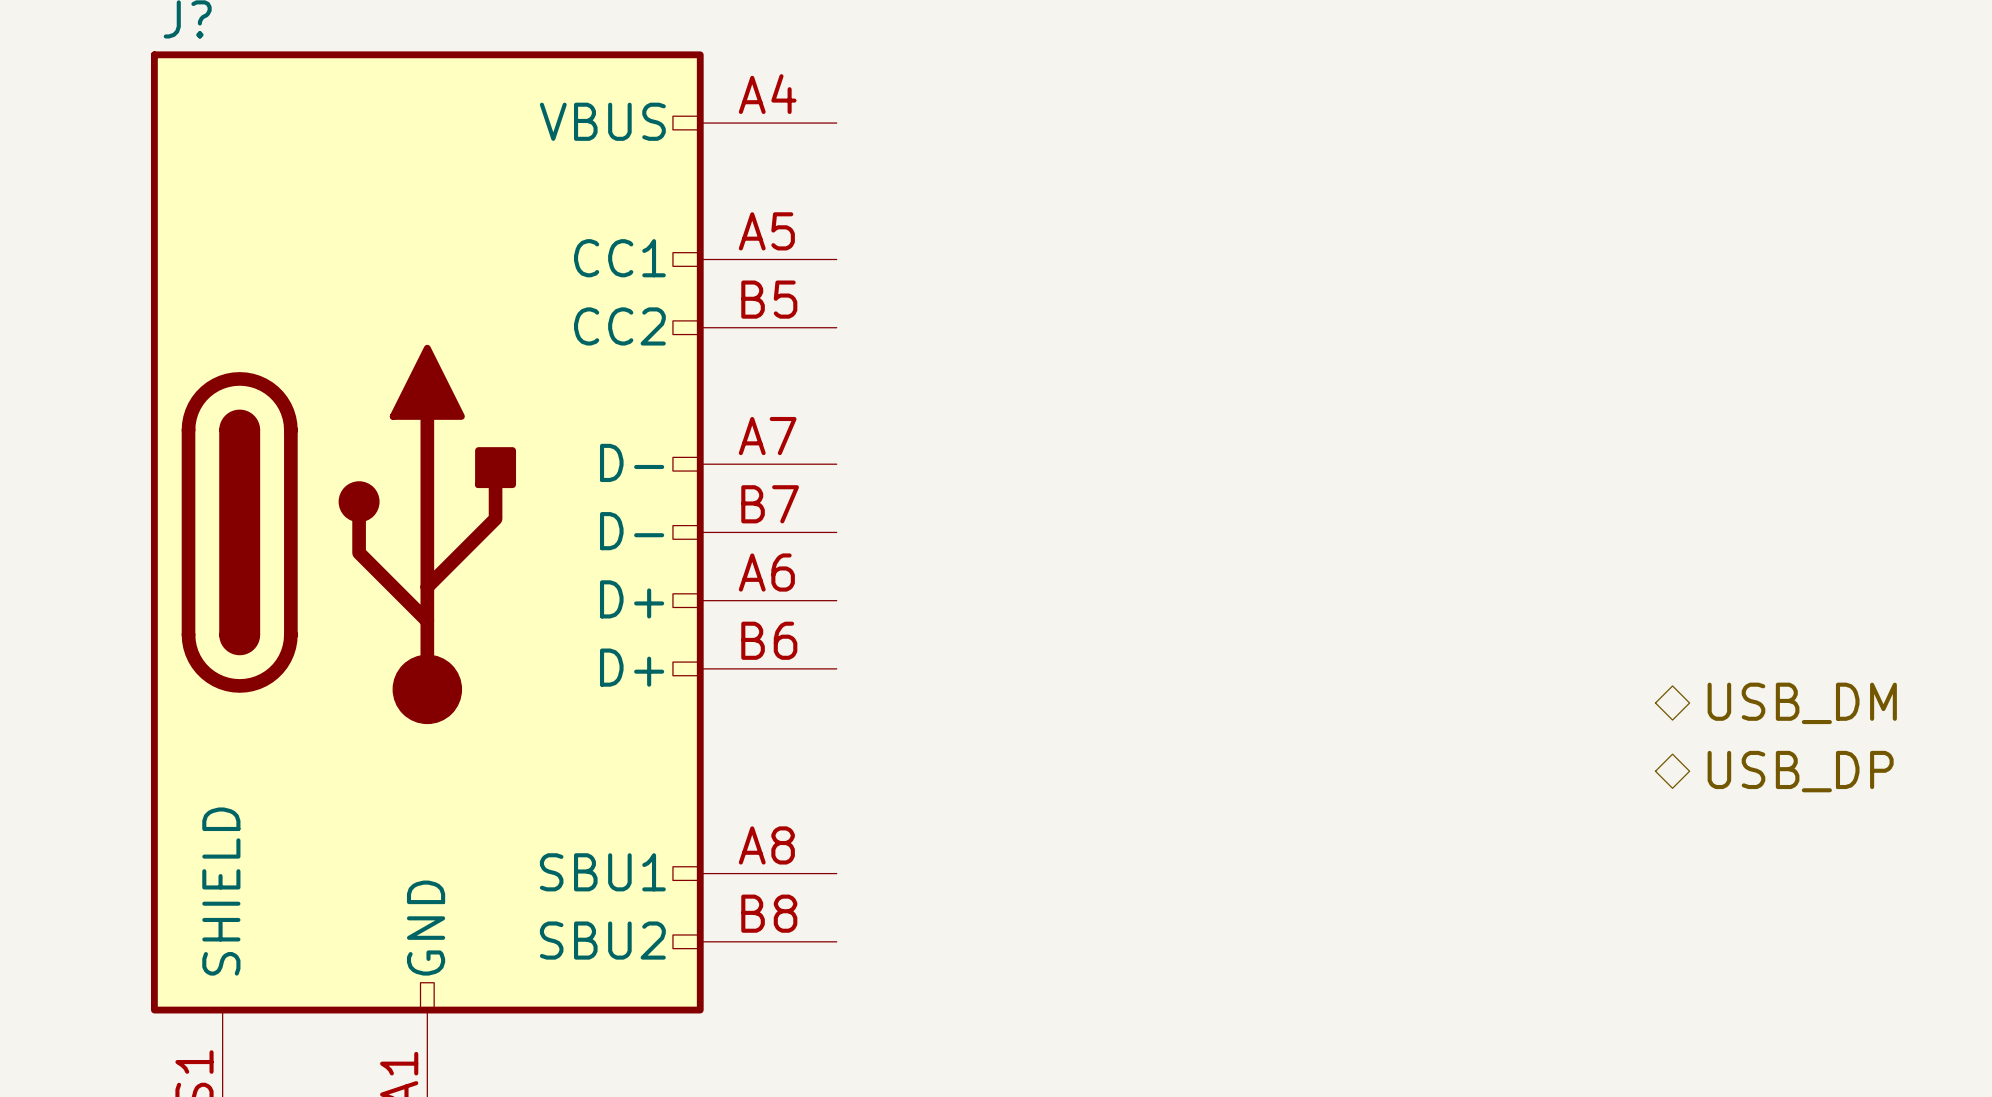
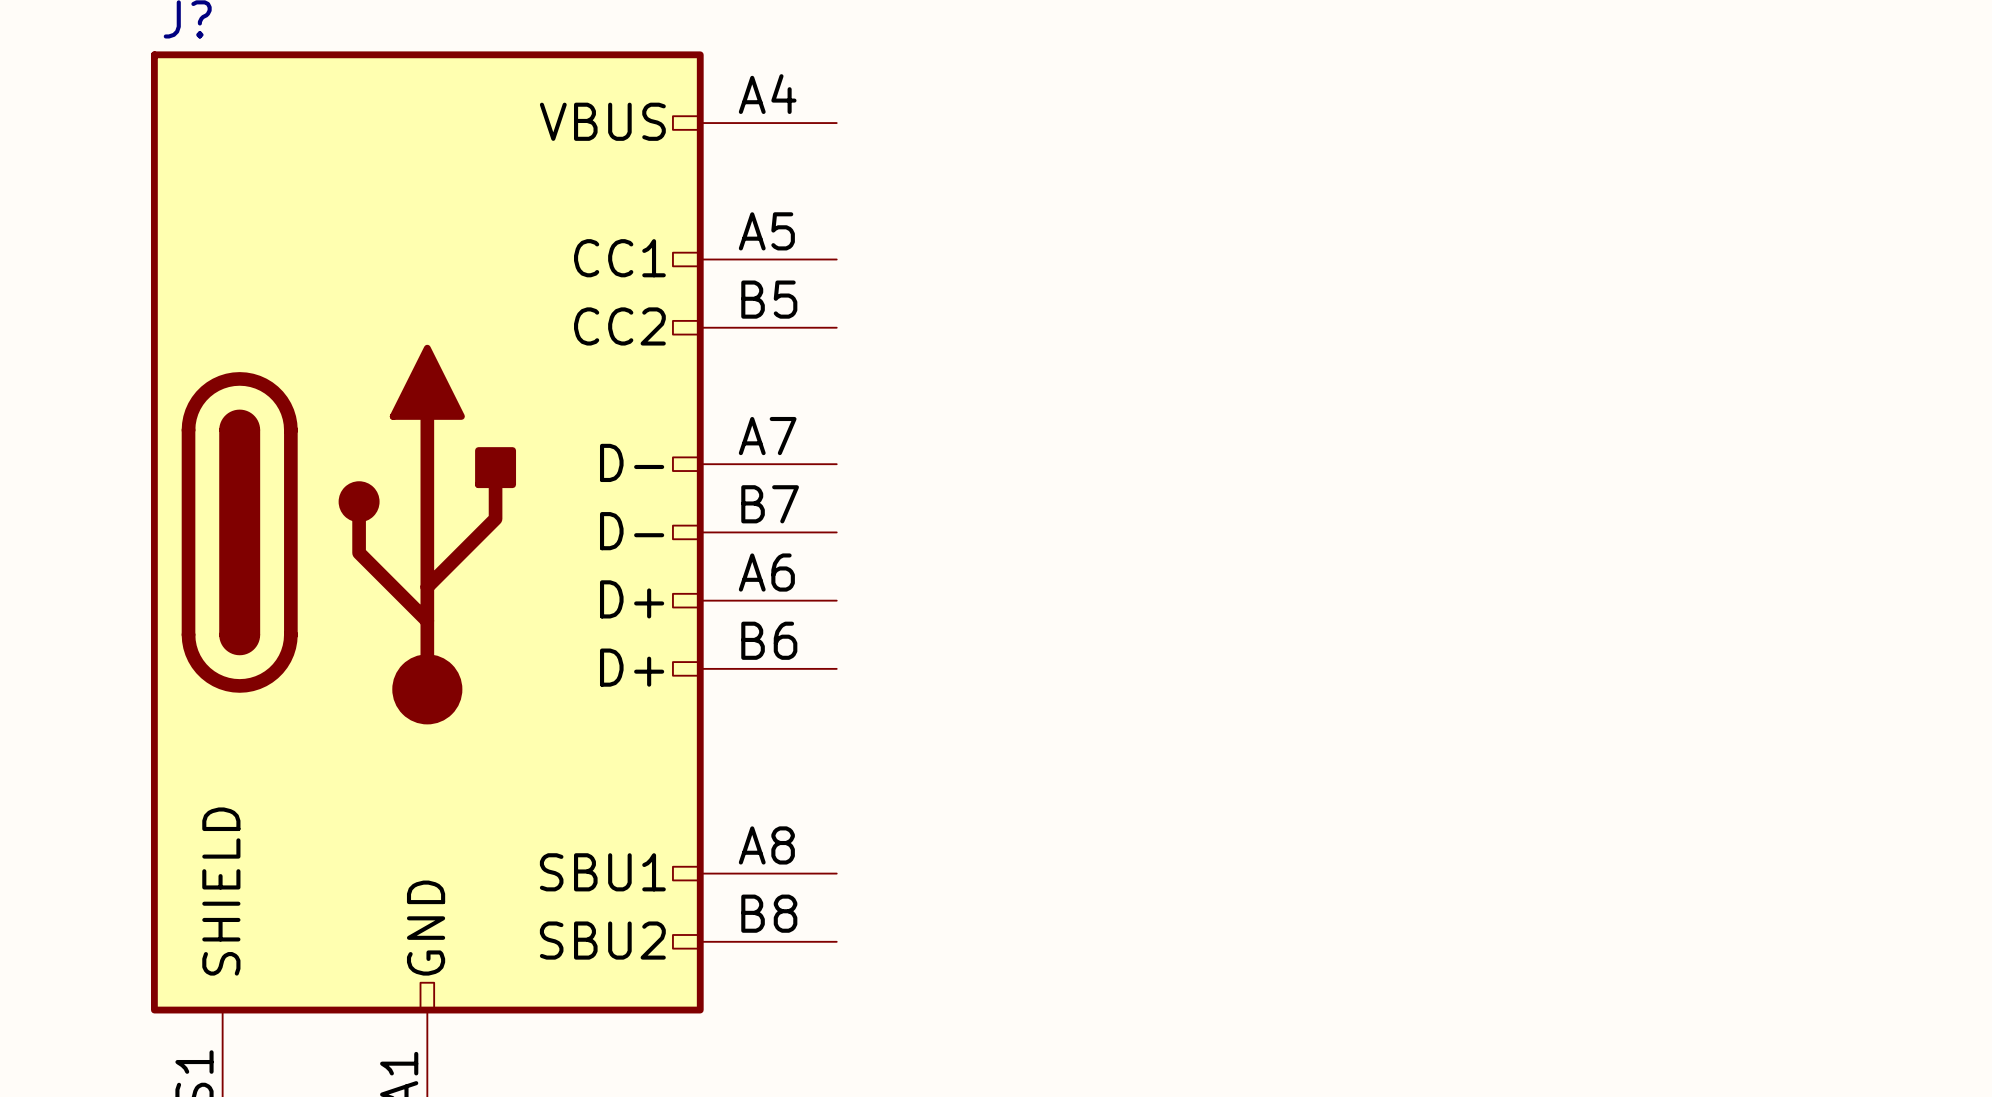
hierarchical label: USB_DM (1802, 703) -> none
hierarchical label: USB_DP (1800, 771) -> none

